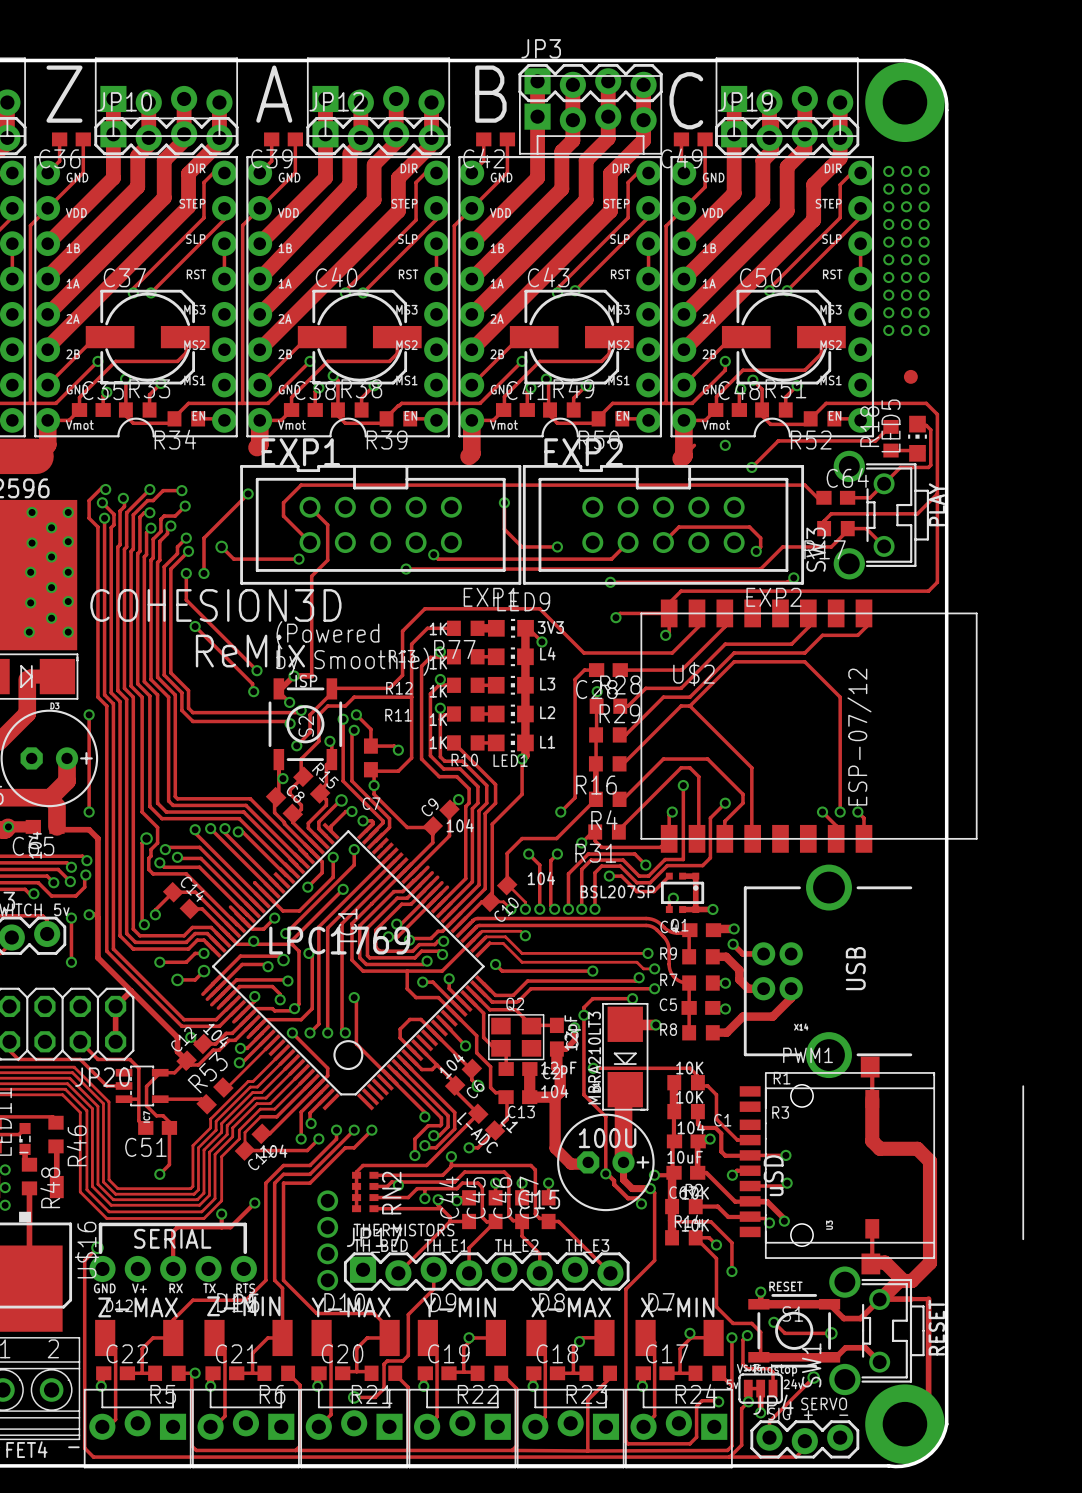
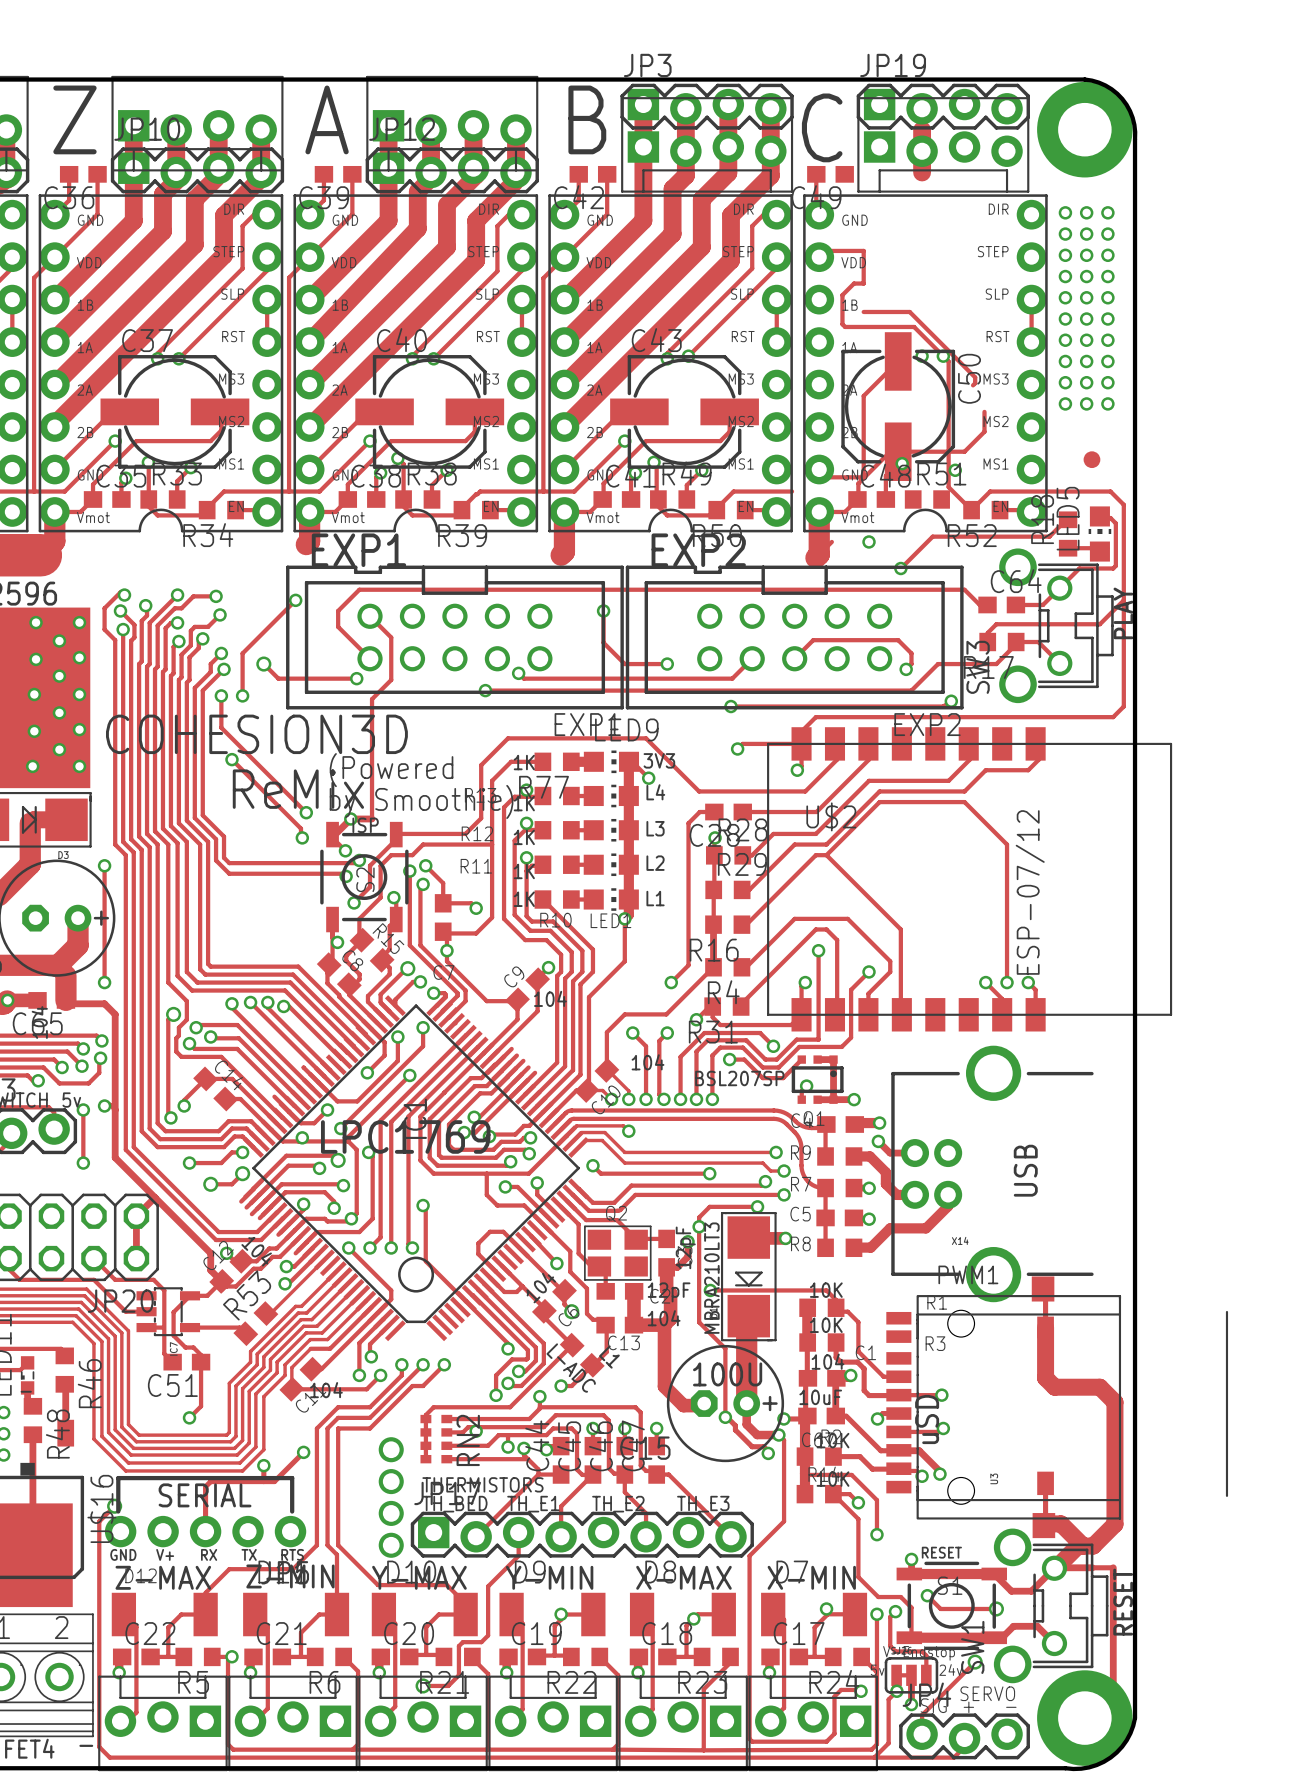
part position: (787, 97) -> (943, 144)
track: (734, 98) (734, 193) (683, 243) -> none
track: (804, 98) (804, 149) (787, 167) (787, 211) (684, 314) -> none
track: (840, 102) (840, 158) (813, 184) (813, 220) (684, 349) -> none
track: (771, 122) (771, 151) (762, 160) (762, 200) (684, 279) -> none
JP19 position: (787, 136) -> (943, 106)
track: (705, 139) (705, 187) (689, 203) -> none
track: (860, 172) (851, 172) (840, 184) (840, 217) (769, 288) (769, 290) -> none
track: (683, 208) (666, 226) (666, 403) -> none
track: (860, 208) (860, 217) (787, 290) -> none
track: none -> (863, 311) (909, 311) (975, 377) (975, 383) (973, 385)
track: (746, 337) (731, 337) (683, 385) -> (898, 361) (863, 395) (863, 477) (827, 477) (819, 469)
C50 rotation: 0° (783, 337) -> 90° clockwise (898, 406)
track: (725, 361) (725, 370) (692, 403) (661, 403) -> none
via: (725, 361) -> none
track: (752, 380) (762, 389) (760, 414) (770, 424) (810, 424) (810, 418) -> (825, 250) (863, 250) (863, 283) (854, 283) (842, 295) (842, 324) (845, 326) (914, 326) (948, 361) (948, 487) (971, 510)
track: (797, 385) (785, 397) (785, 410) -> none
via: (740, 389) -> none

